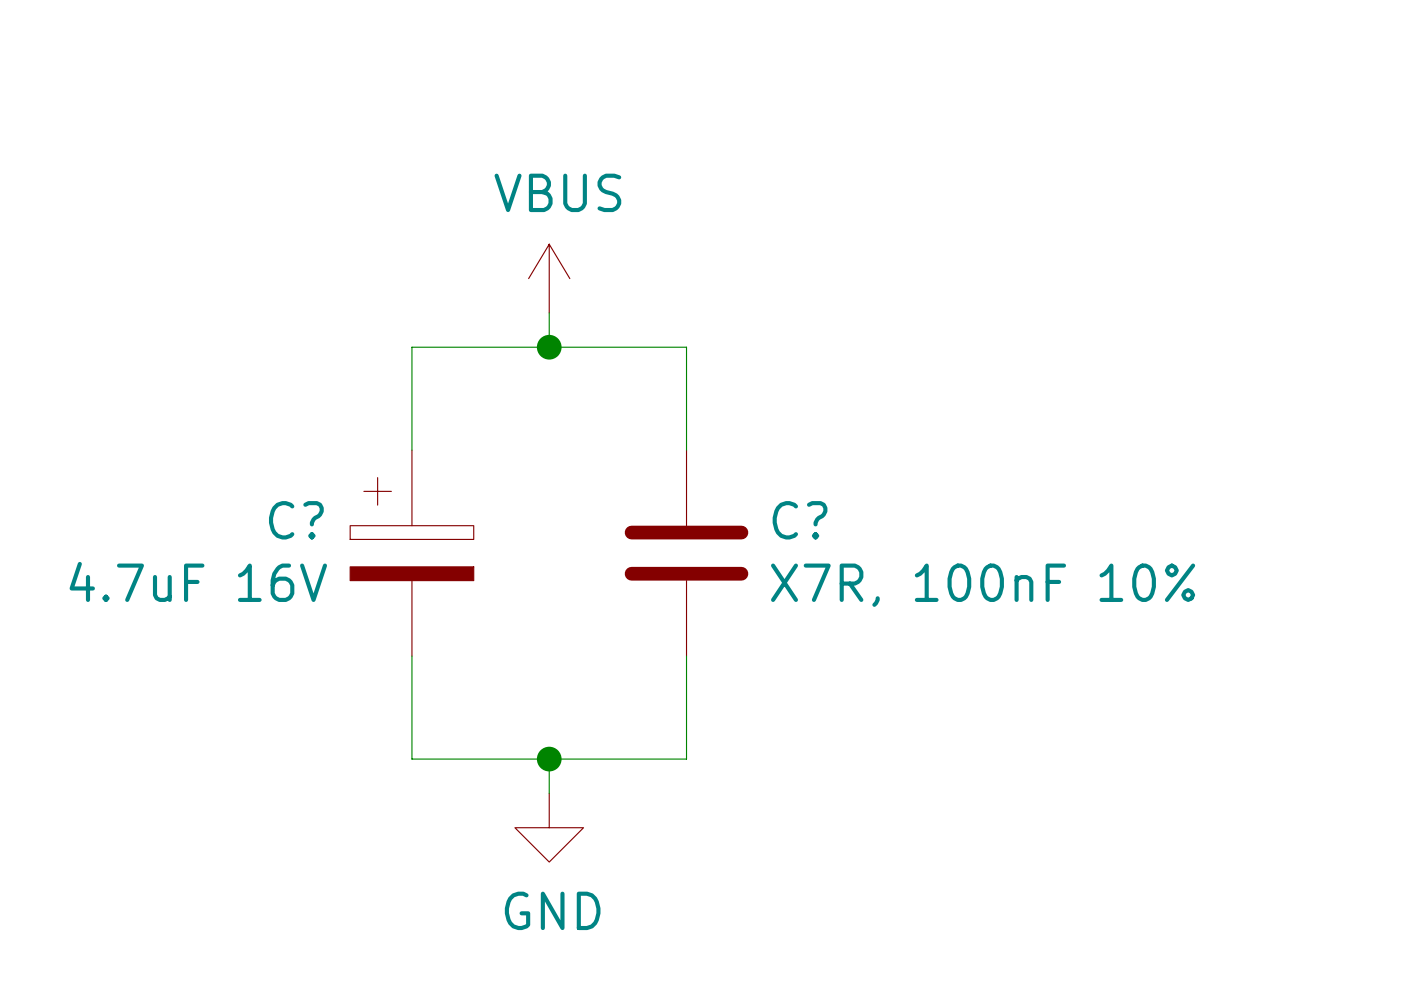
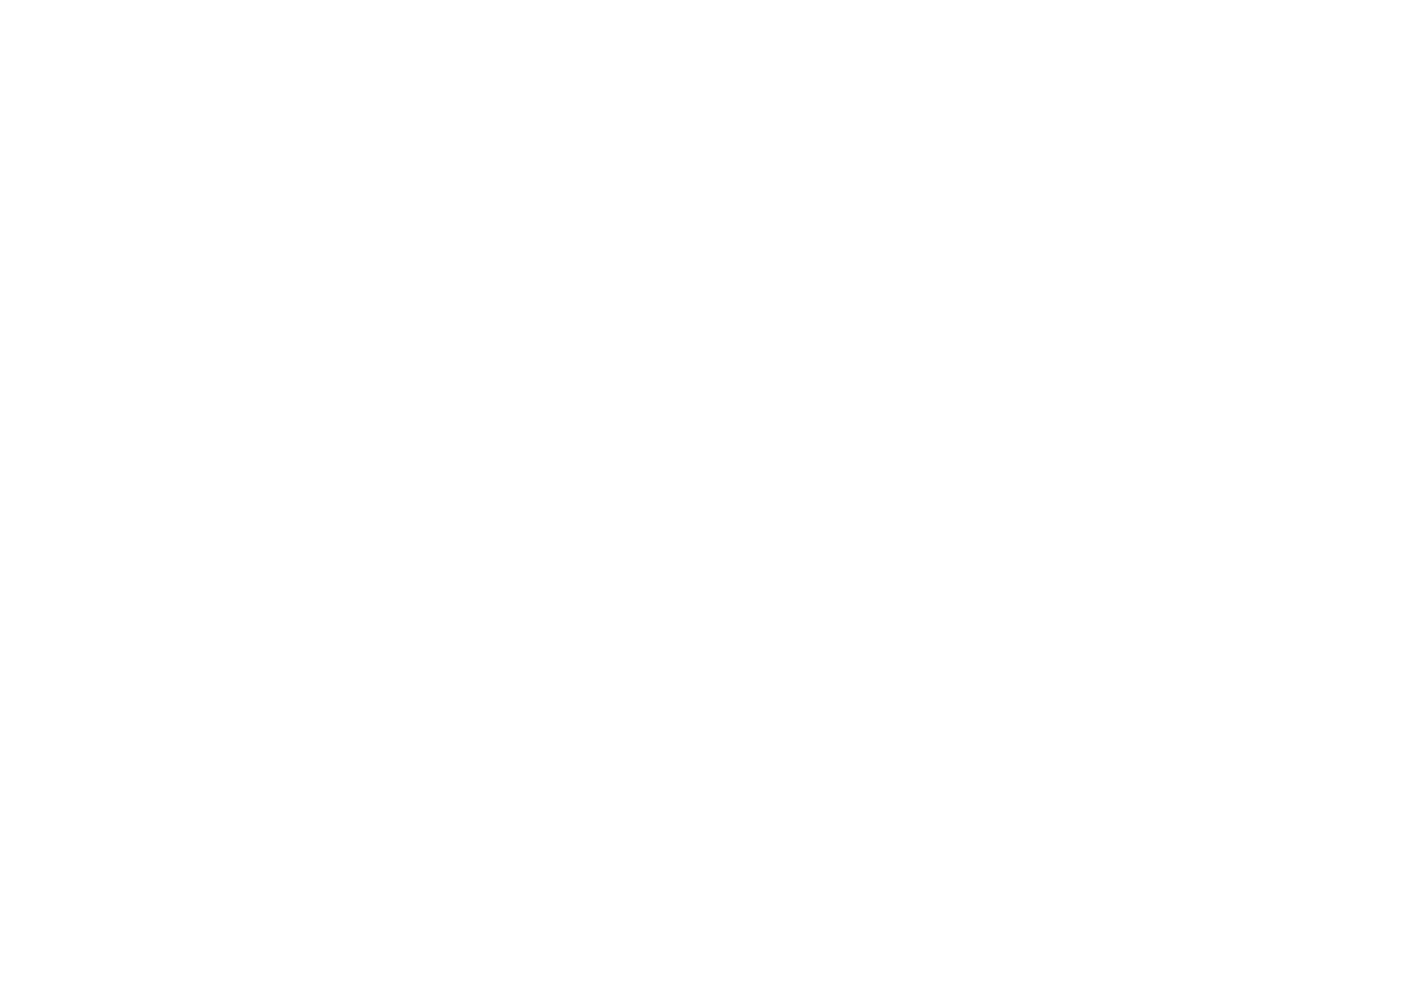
power symbol: VBUS (549, 278) -> none
wire: (549, 312) (549, 347) -> none
junction: (549, 347) -> none
wire: (411, 450) (411, 347) (686, 347) (686, 450) -> none
C?: 4.7uF 16V (411, 553) -> none
C?: X7R, 100nF 10% (686, 553) -> none
wire: (411, 656) (411, 759) (686, 759) (686, 656) -> none
wire: (549, 759) (549, 793) -> none
junction: (549, 759) -> none
power symbol: GND (549, 827) -> none

